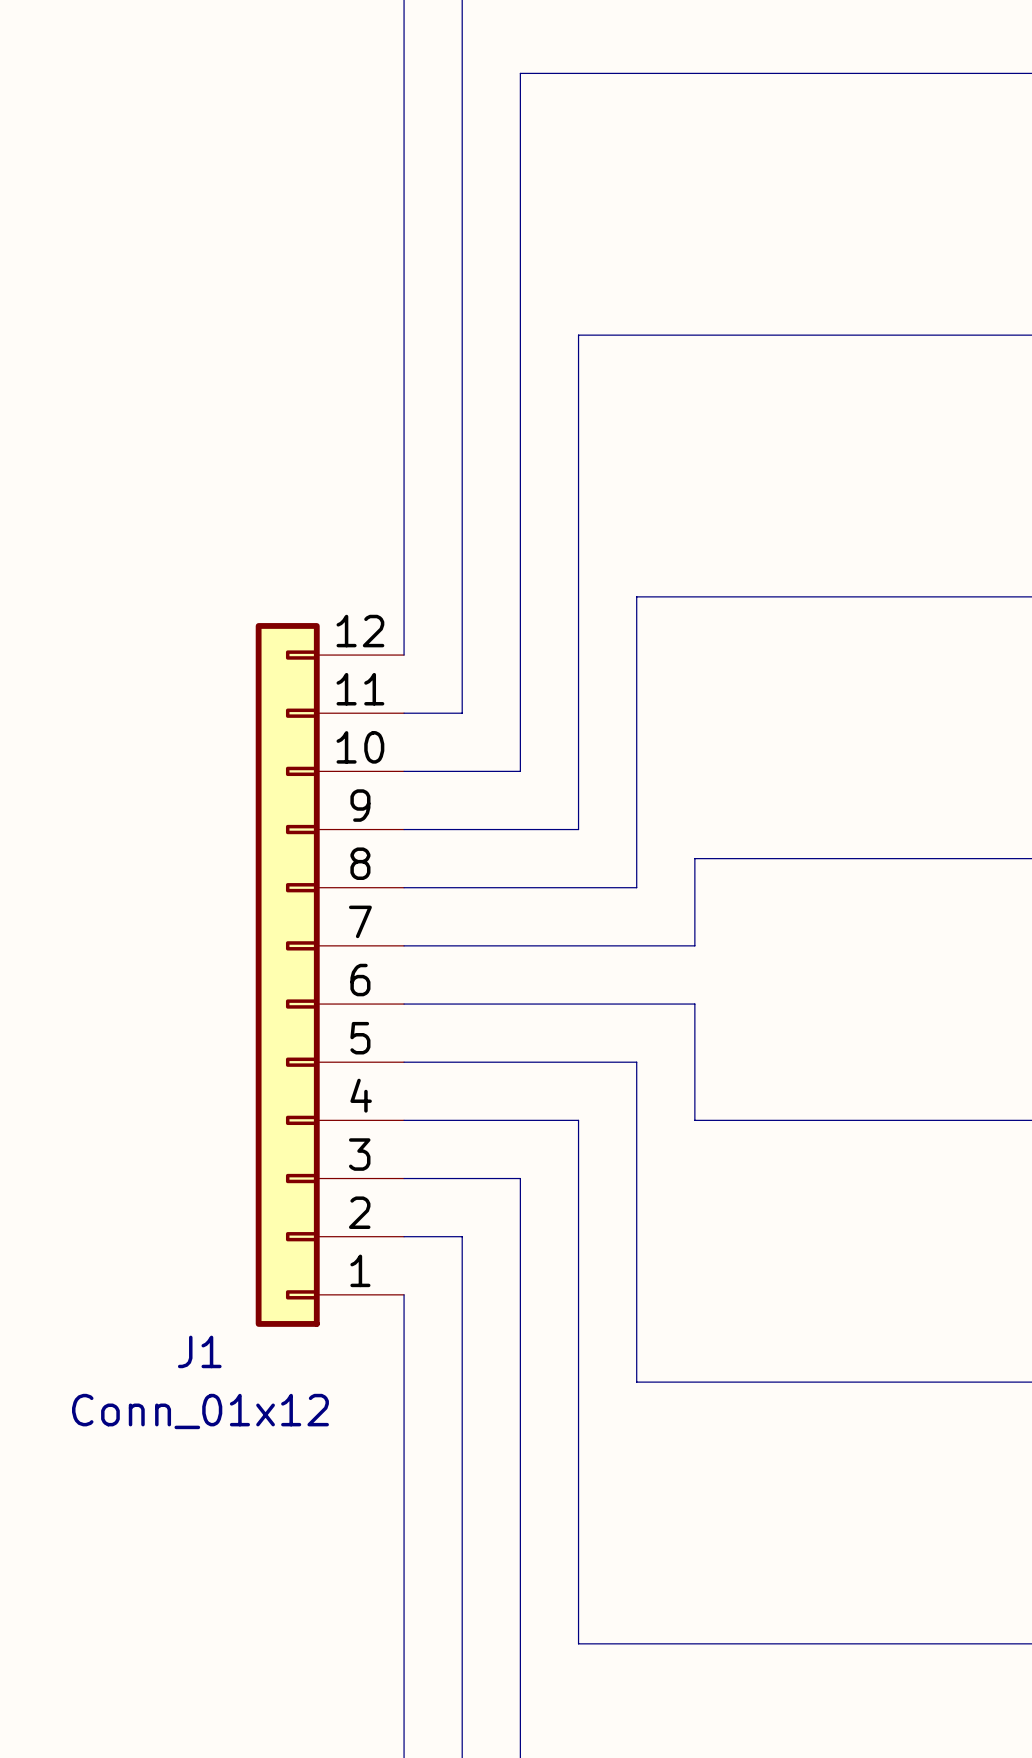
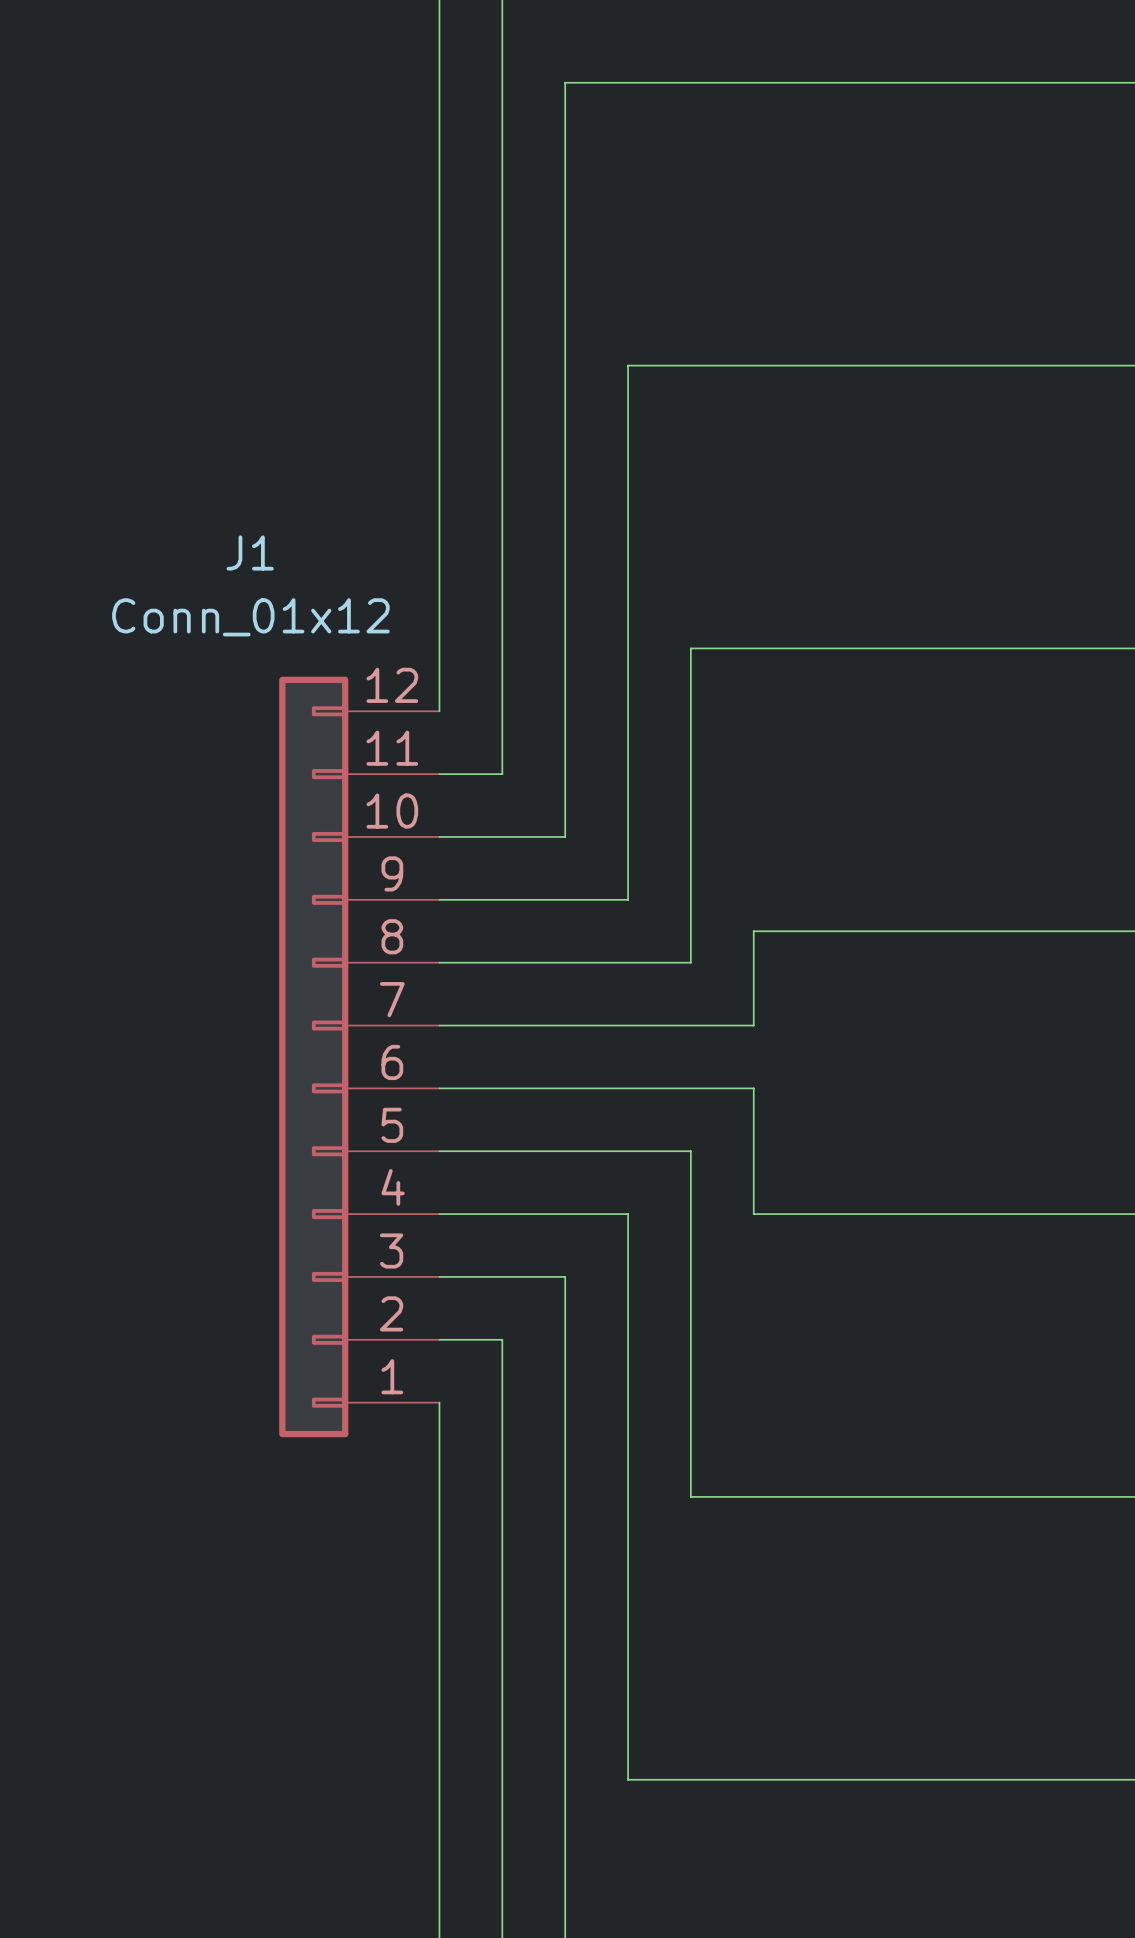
J1 name position: J1 (199, 1351) -> J1 (250, 552)
J1 value position: Conn_01x12 (200, 1411) -> Conn_01x12 (250, 617)

